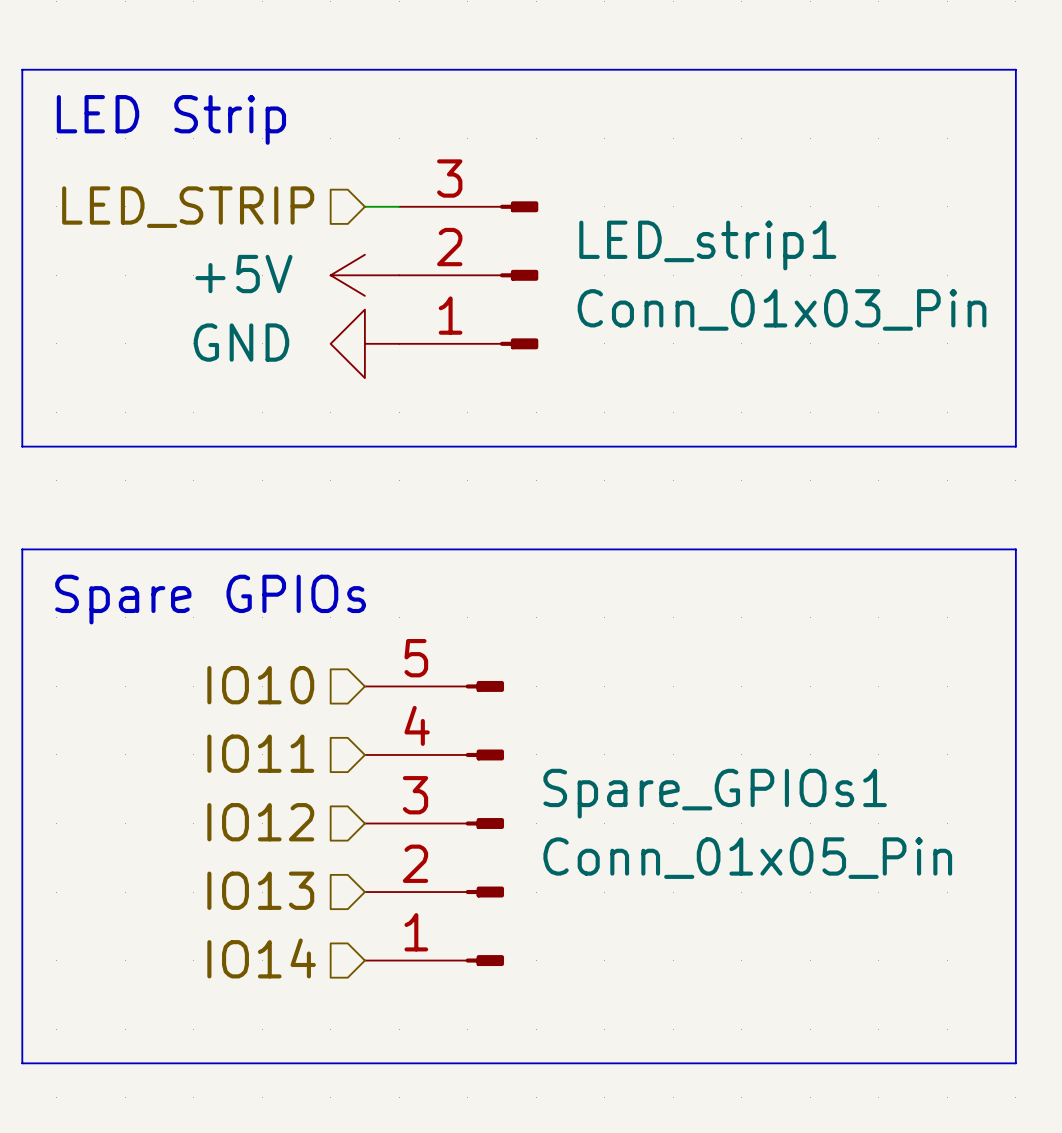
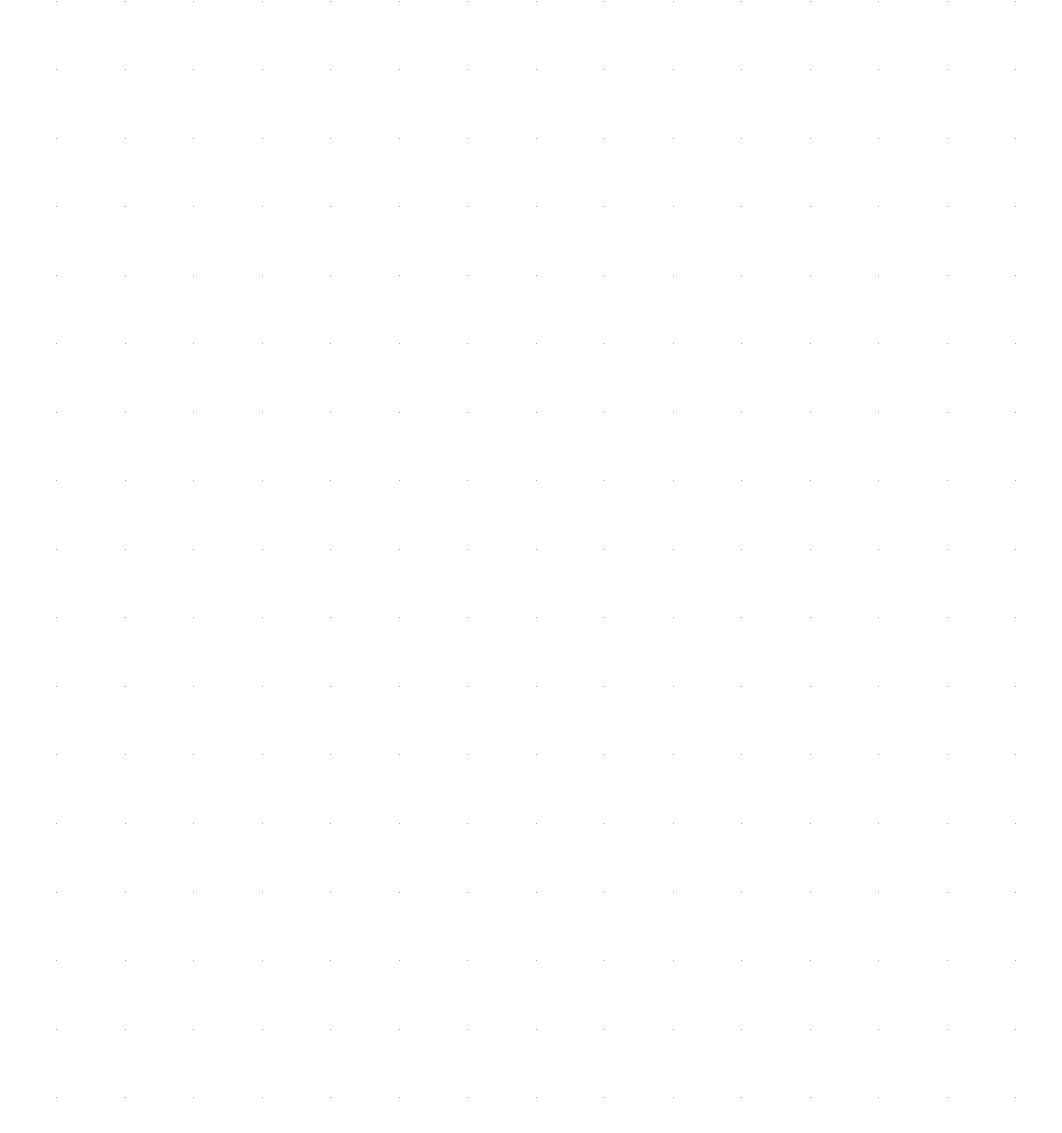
line: (22, 69) (1015, 69) (1015, 446) (22, 446) (22, 69) -> none
text: LED Strip (171, 119) -> none
wire: (364, 206) (399, 206) -> none
hierarchical label: LED_STRIP (188, 207) -> none
power symbol: +5V (364, 275) -> none
LED_strip1: Conn_01x03_Pin (468, 275) -> none
power symbol: GND (364, 343) -> none
line: (22, 549) (22, 1063) (1015, 1063) (1015, 549) (22, 549) -> none
text: Spare GPIOs (210, 599) -> none
hierarchical label: IO10 (260, 685) -> none
hierarchical label: IO11 (260, 753) -> none
hierarchical label: IO12 (260, 822) -> none
Spare_GPIOs1: Conn_01x05_Pin (434, 823) -> none
hierarchical label: IO13 (260, 890) -> none
hierarchical label: IO14 (261, 958) -> none

